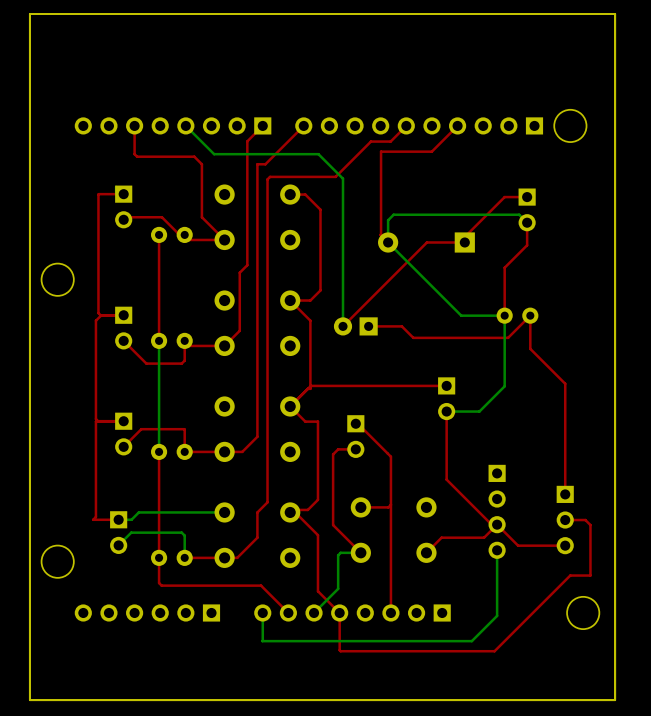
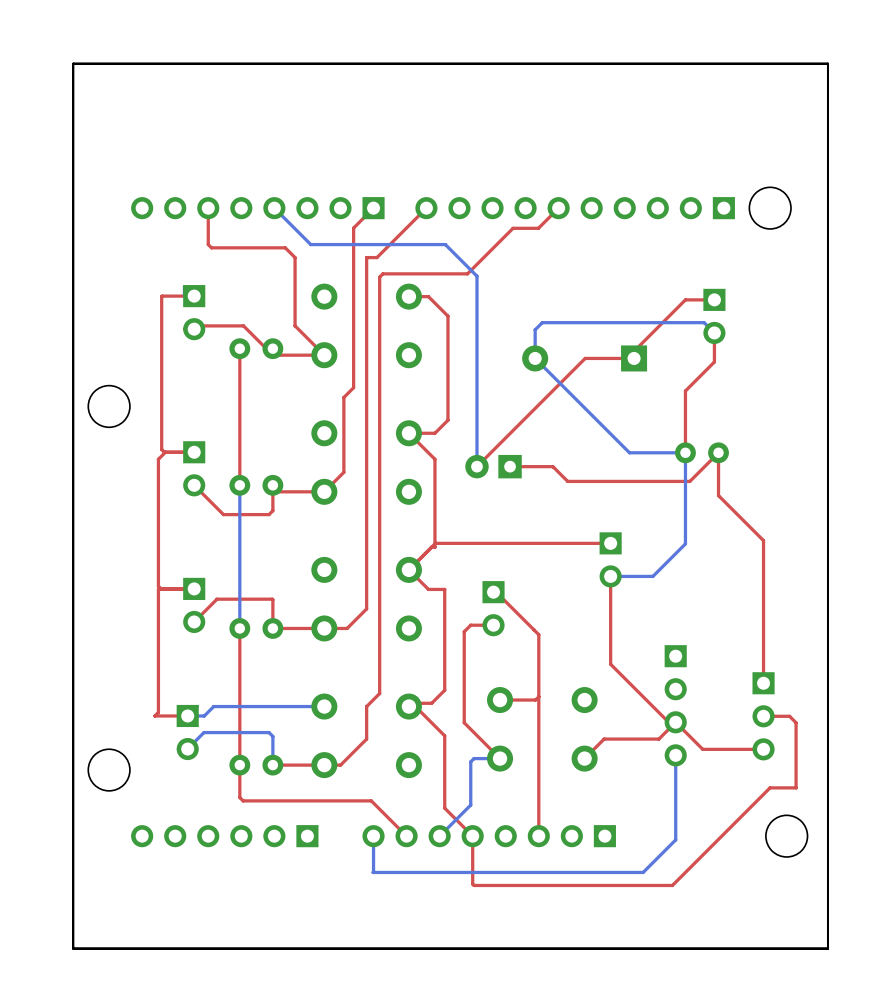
top track: (457, 125) (431, 151) (381, 151) (380, 234) (388, 242) -> none

